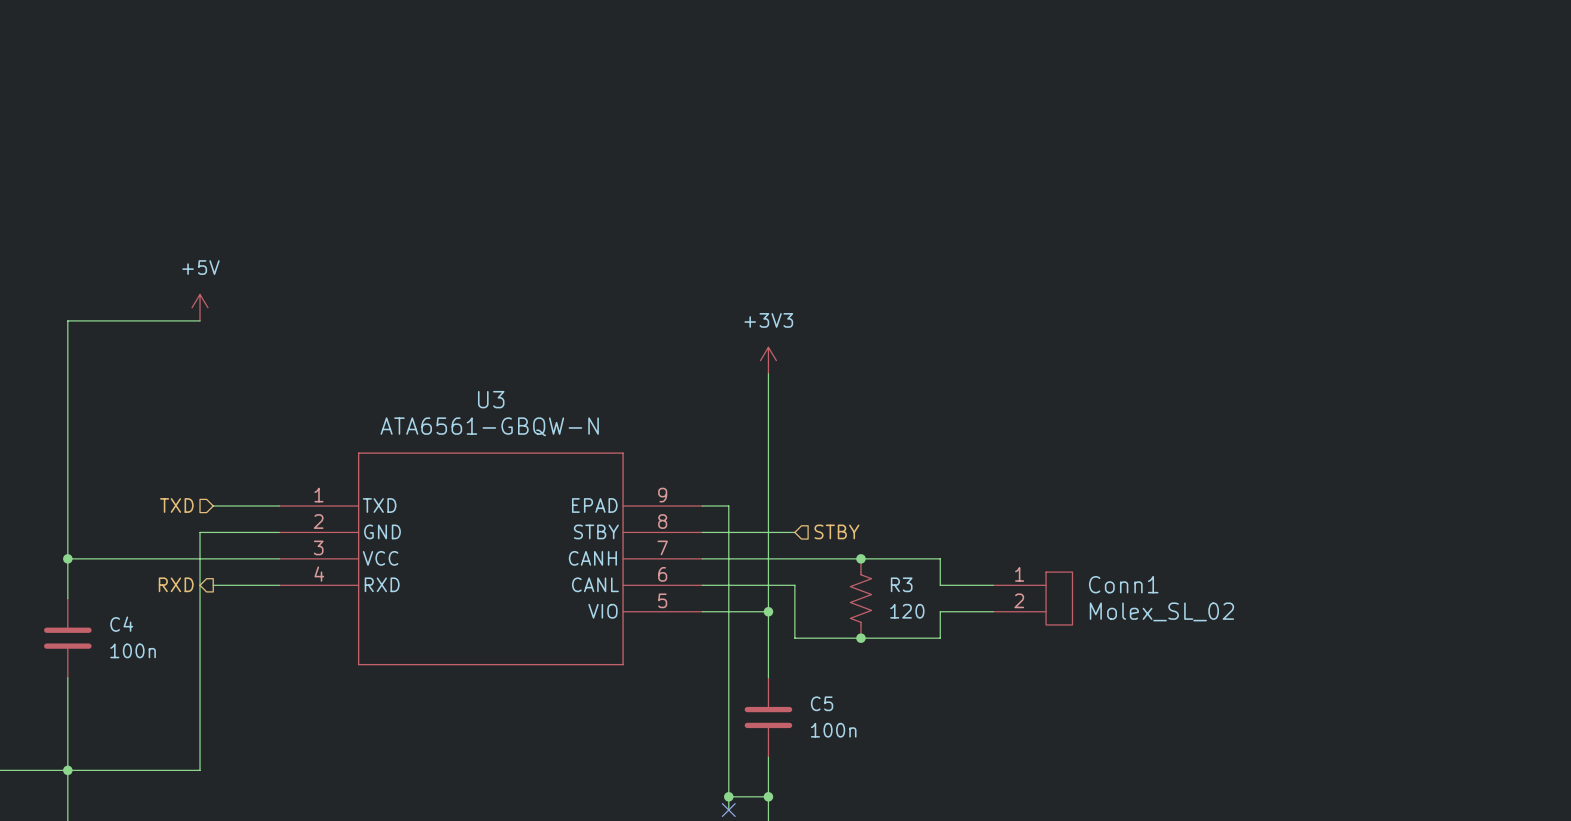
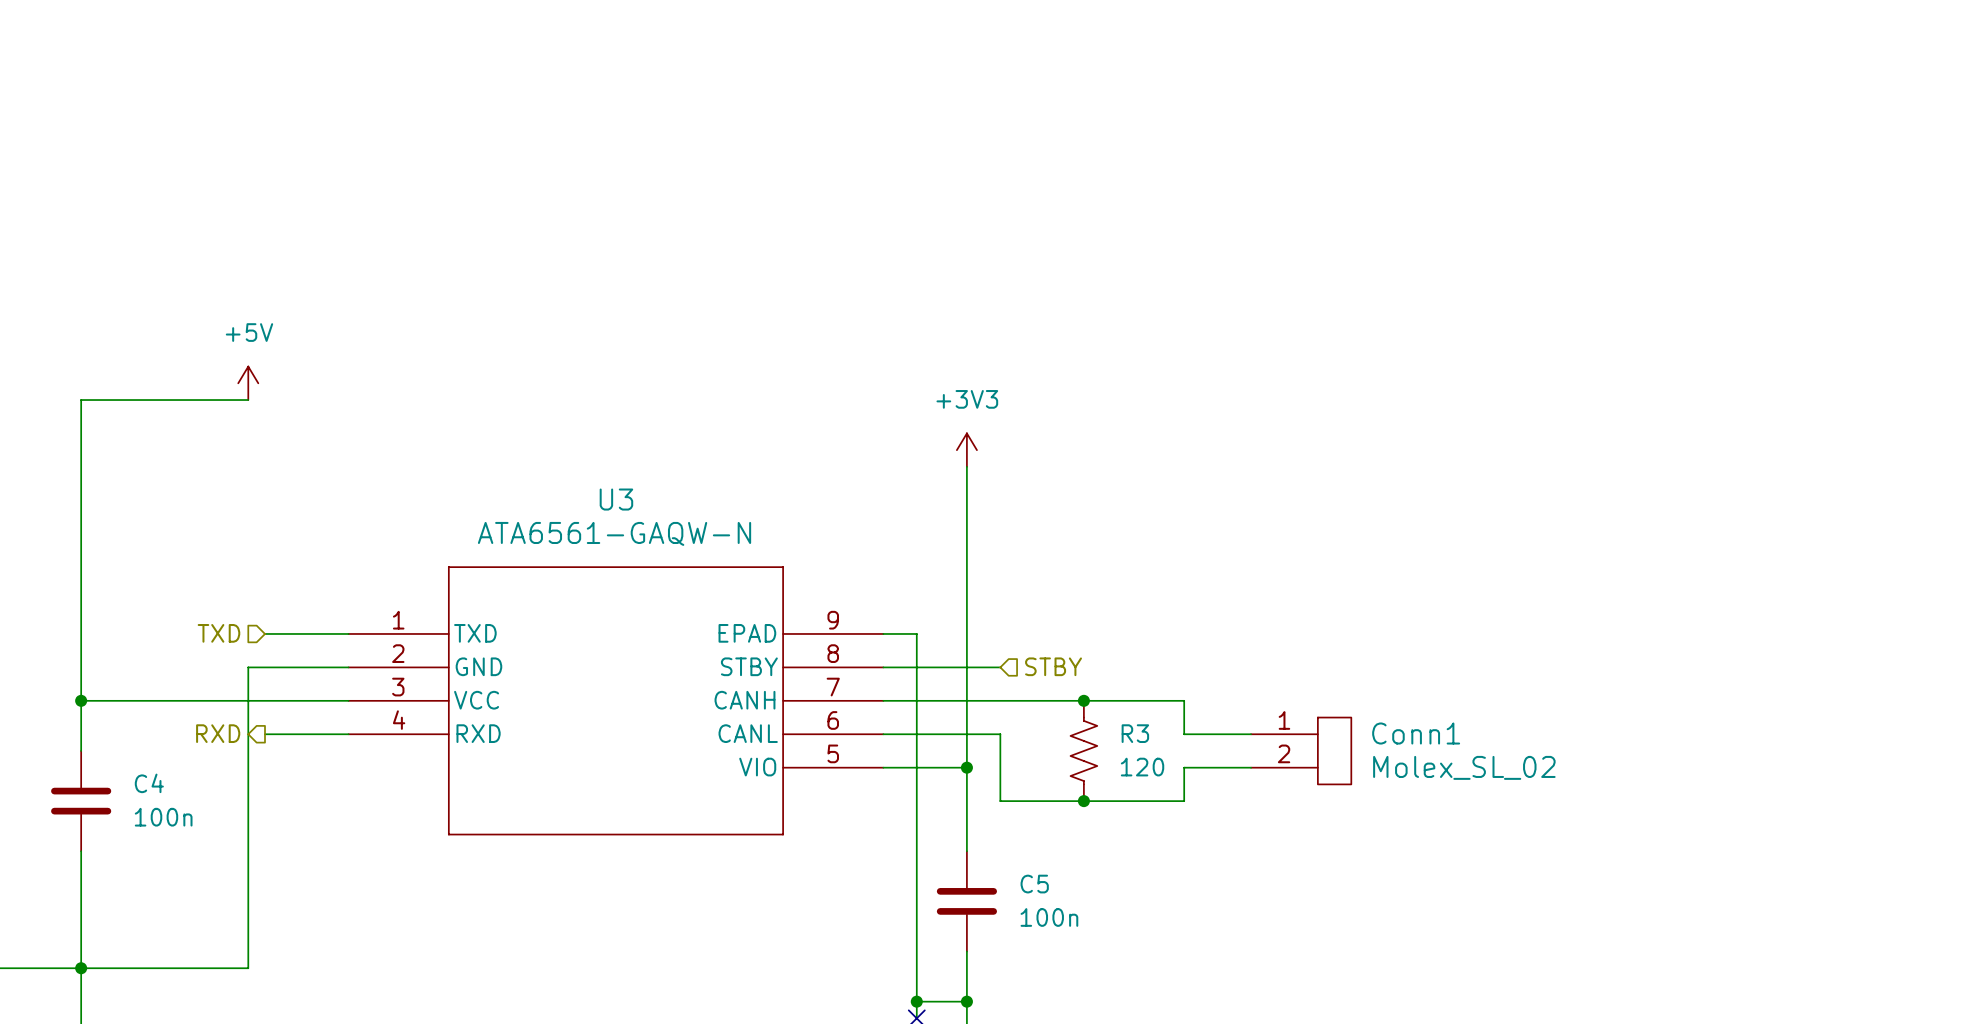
U3 value: ATA6561-GBQW-N (489, 426) -> ATA6561-GAQW-N (614, 533)

